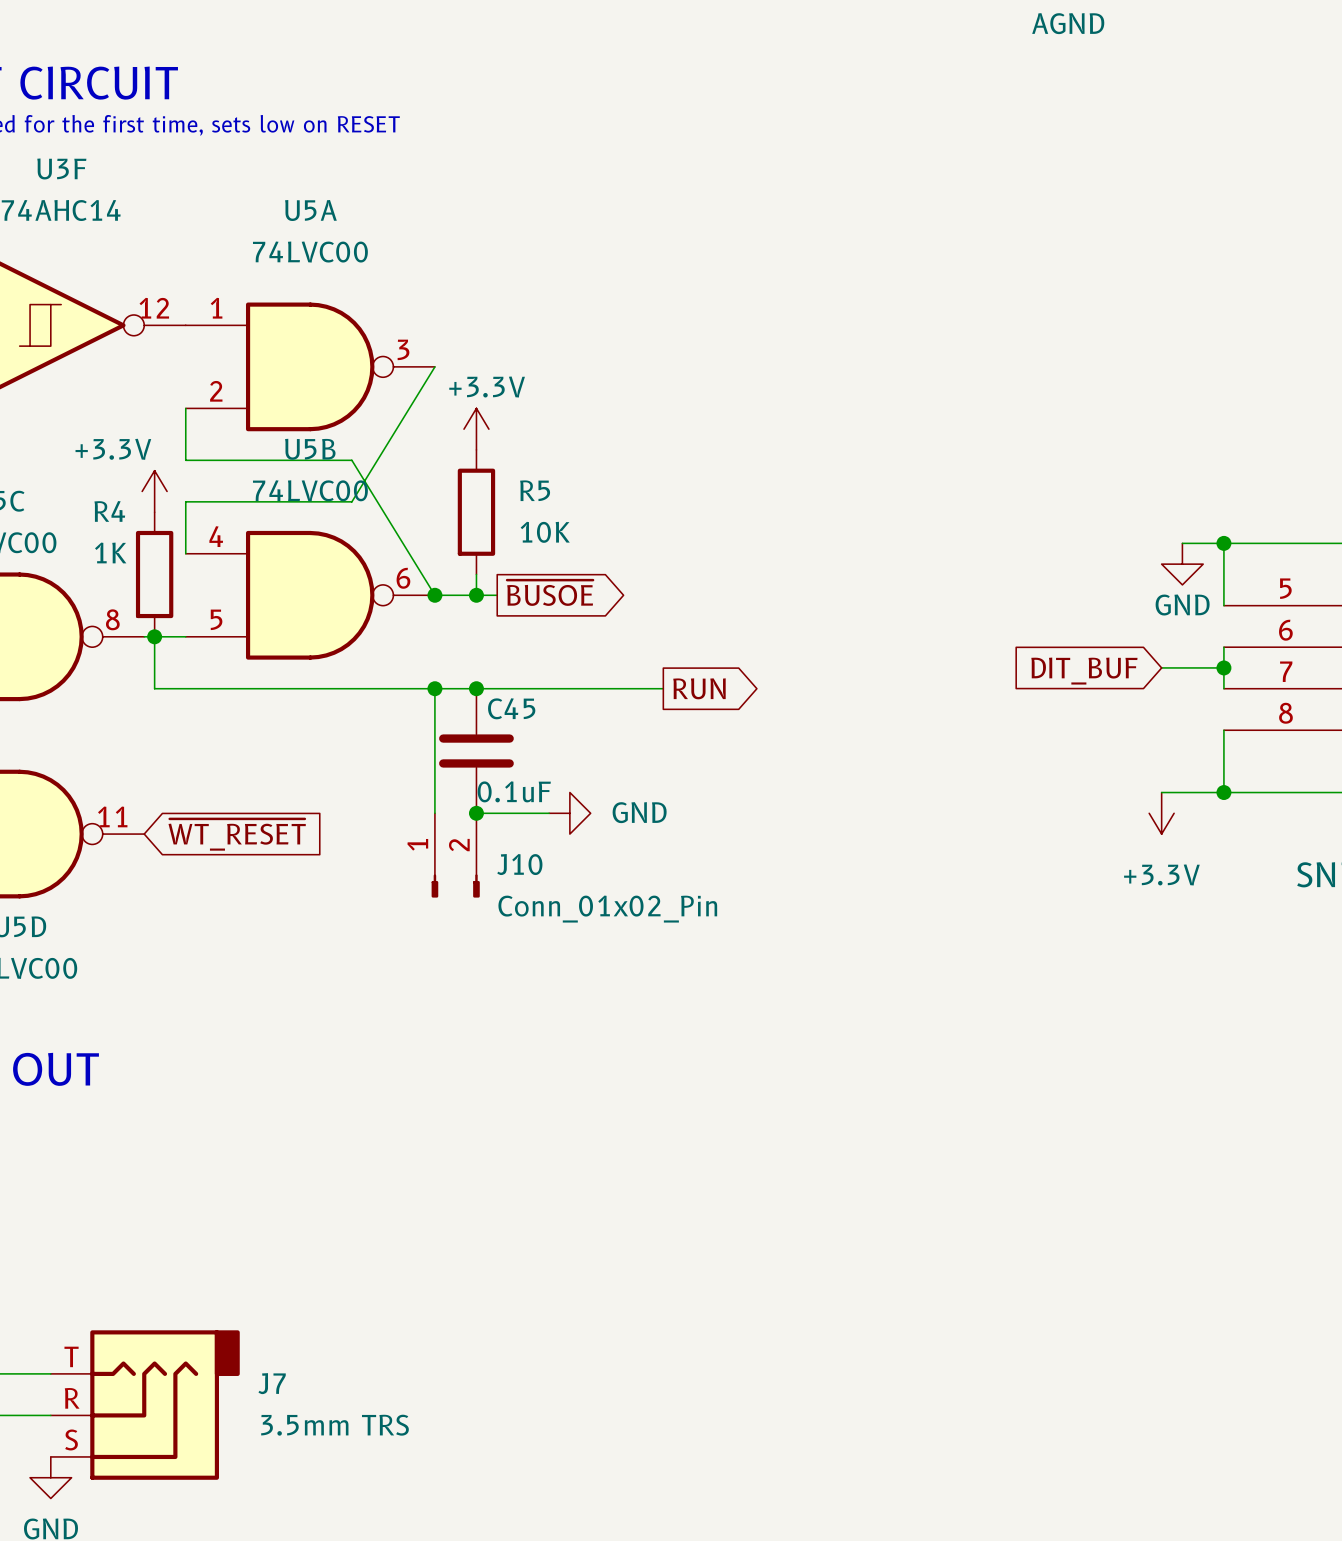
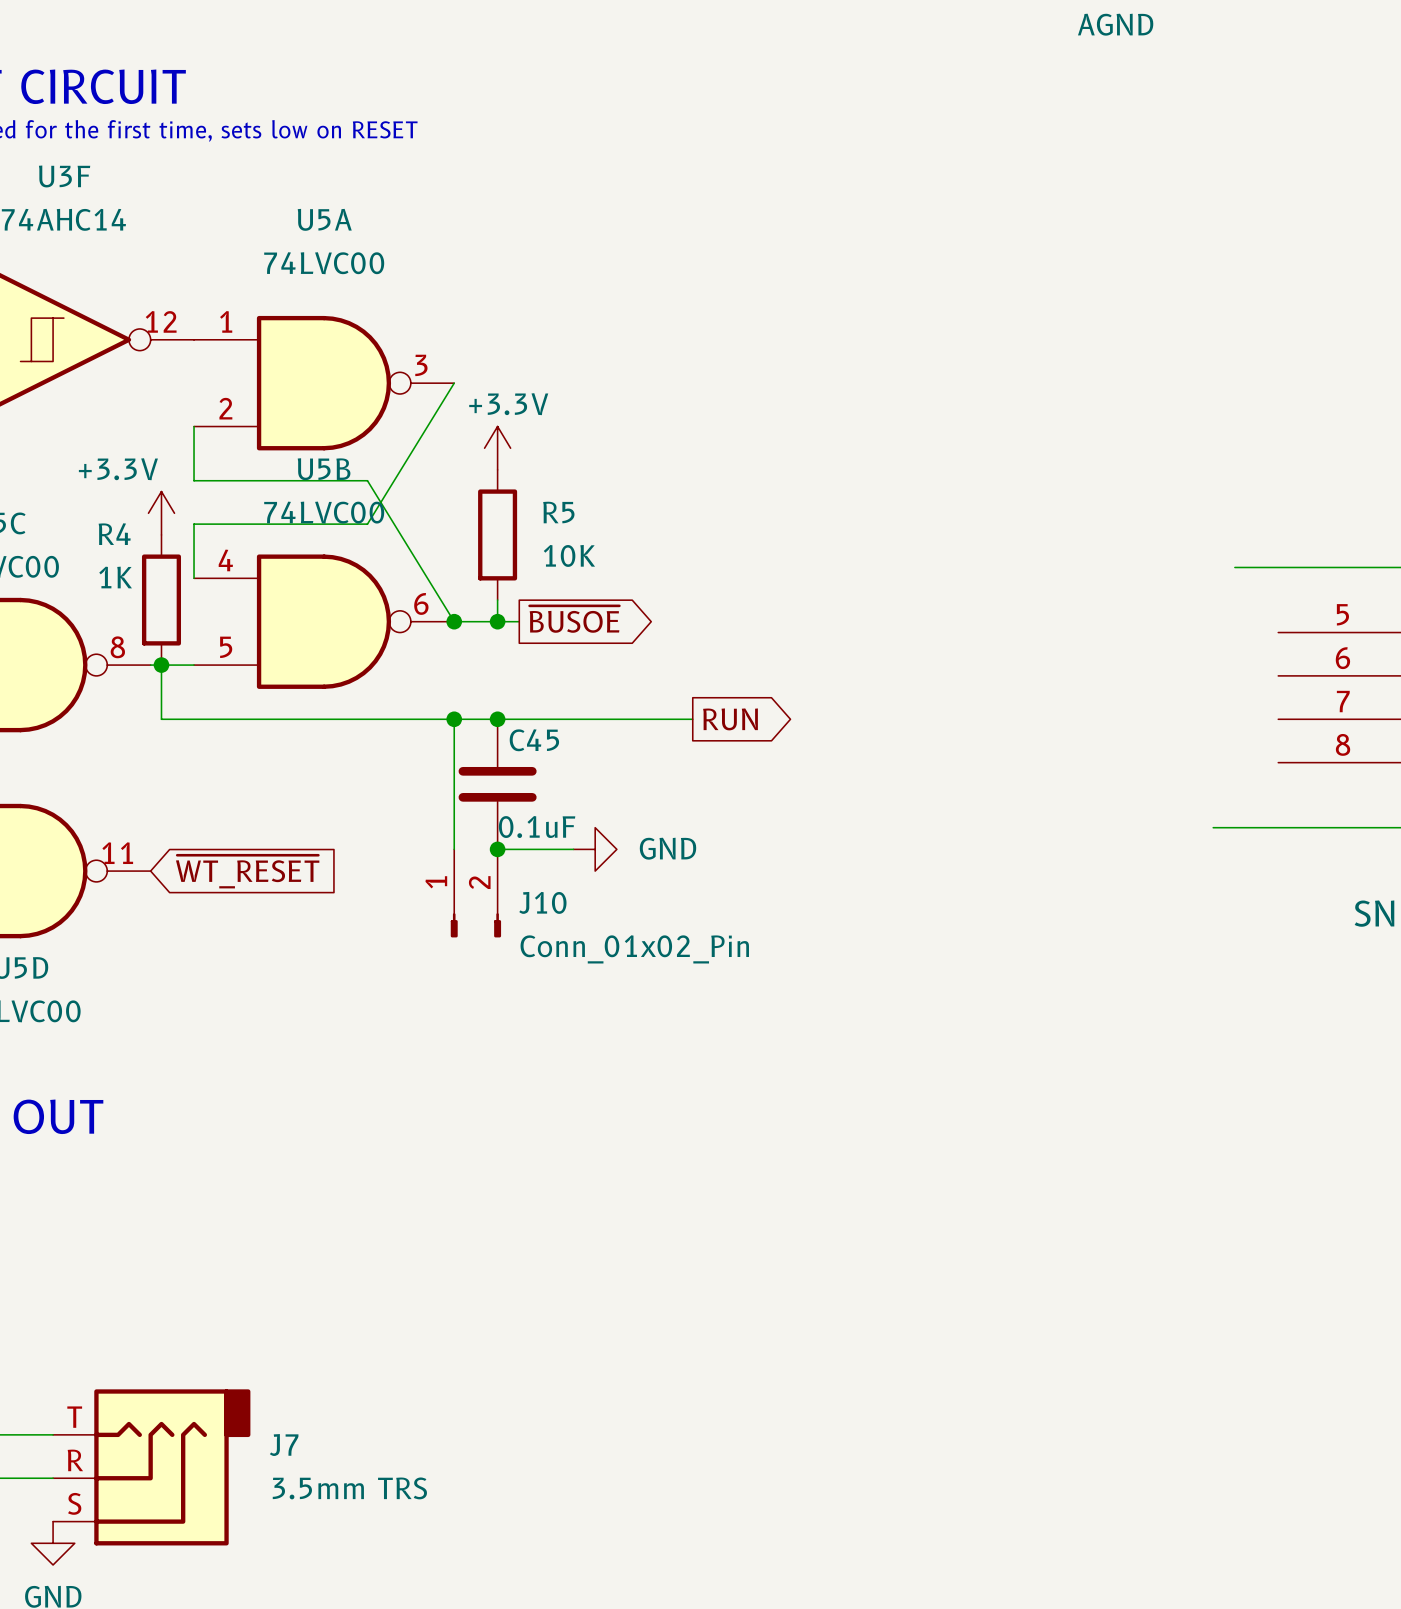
wire: (1223, 543) (1223, 605) -> none
junction: (1223, 543) -> none
power symbol: GND (1182, 564) -> none
wire: (1223, 647) (1223, 688) -> none
wire: (1161, 667) (1223, 667) -> none
junction: (1223, 667) -> none
global label: DIT_BUF (1084, 671) -> none
wire: (1223, 730) (1223, 792) -> none
junction: (1223, 792) -> none
power symbol: +3.3V (1161, 813) -> none

